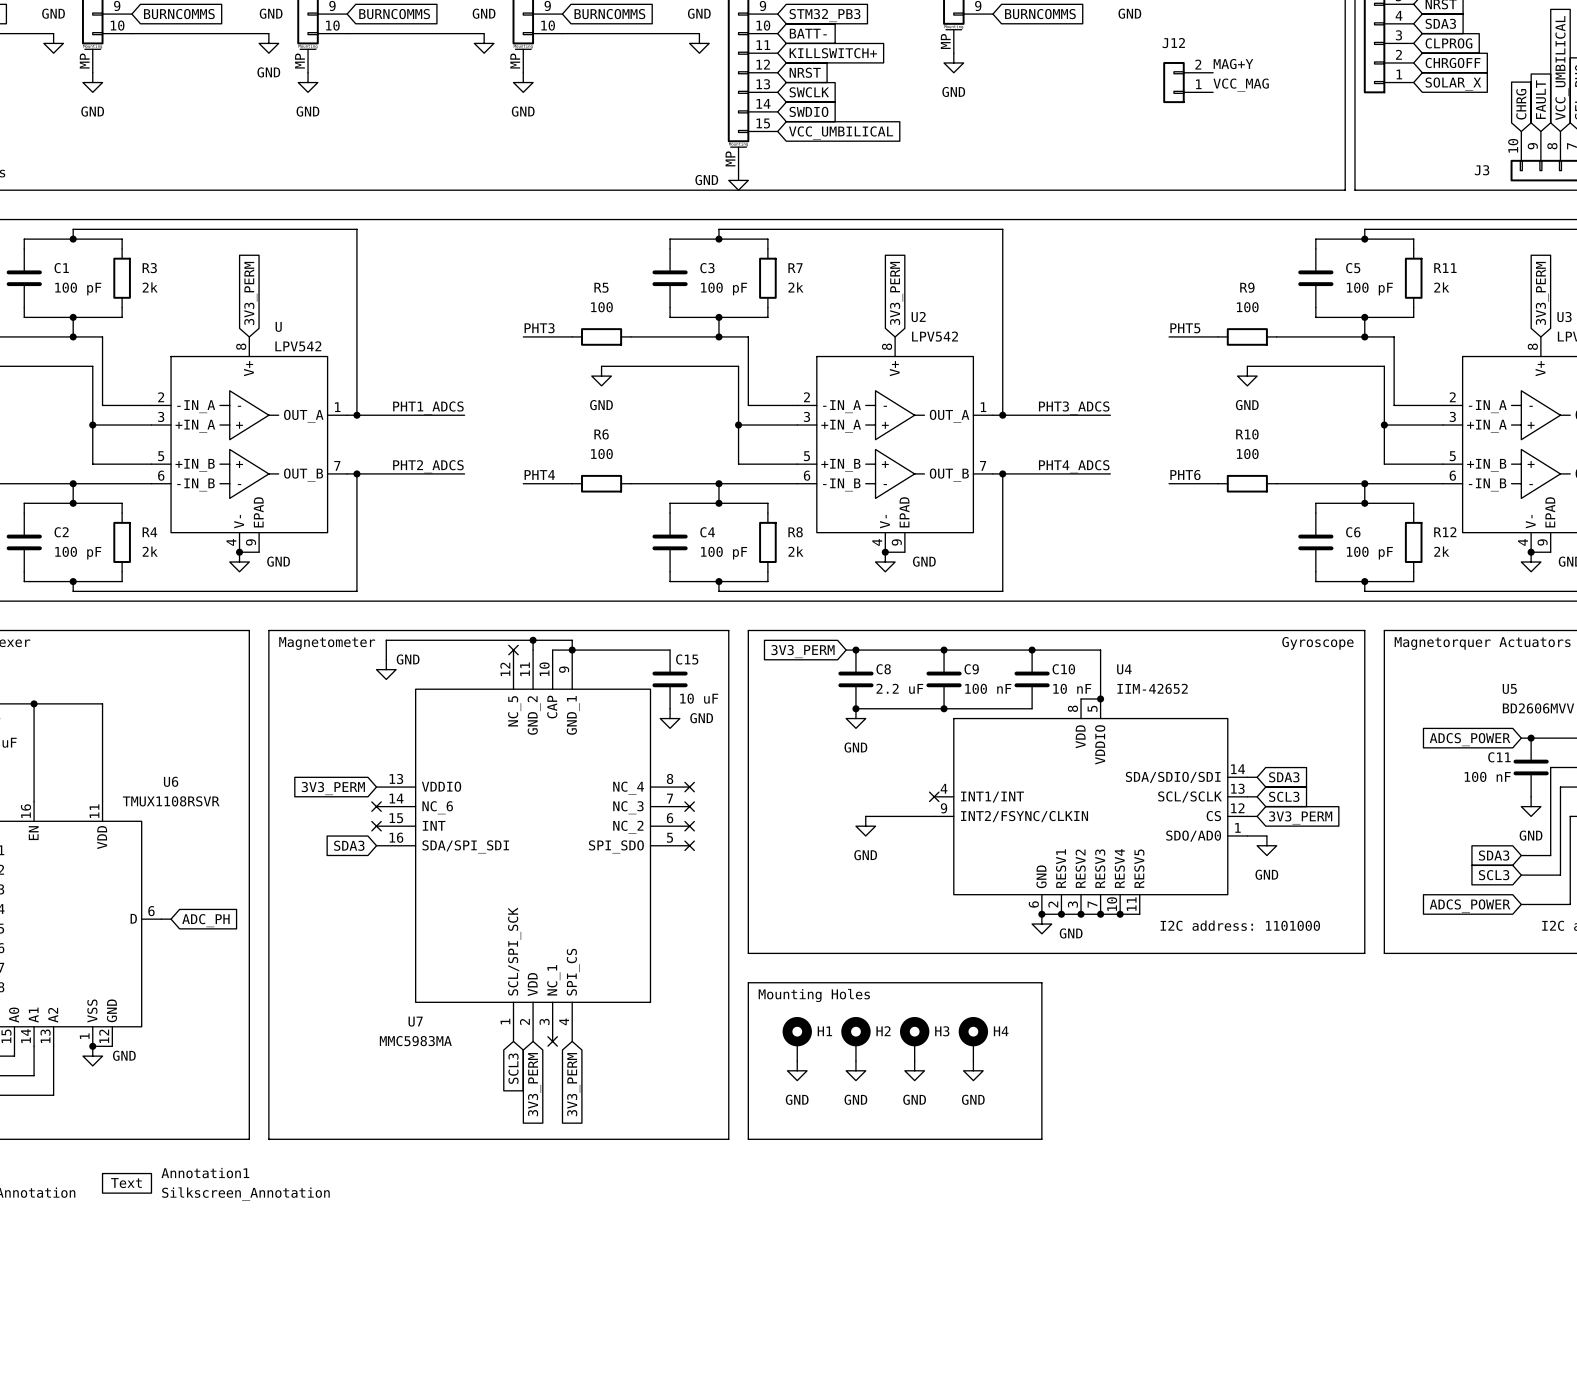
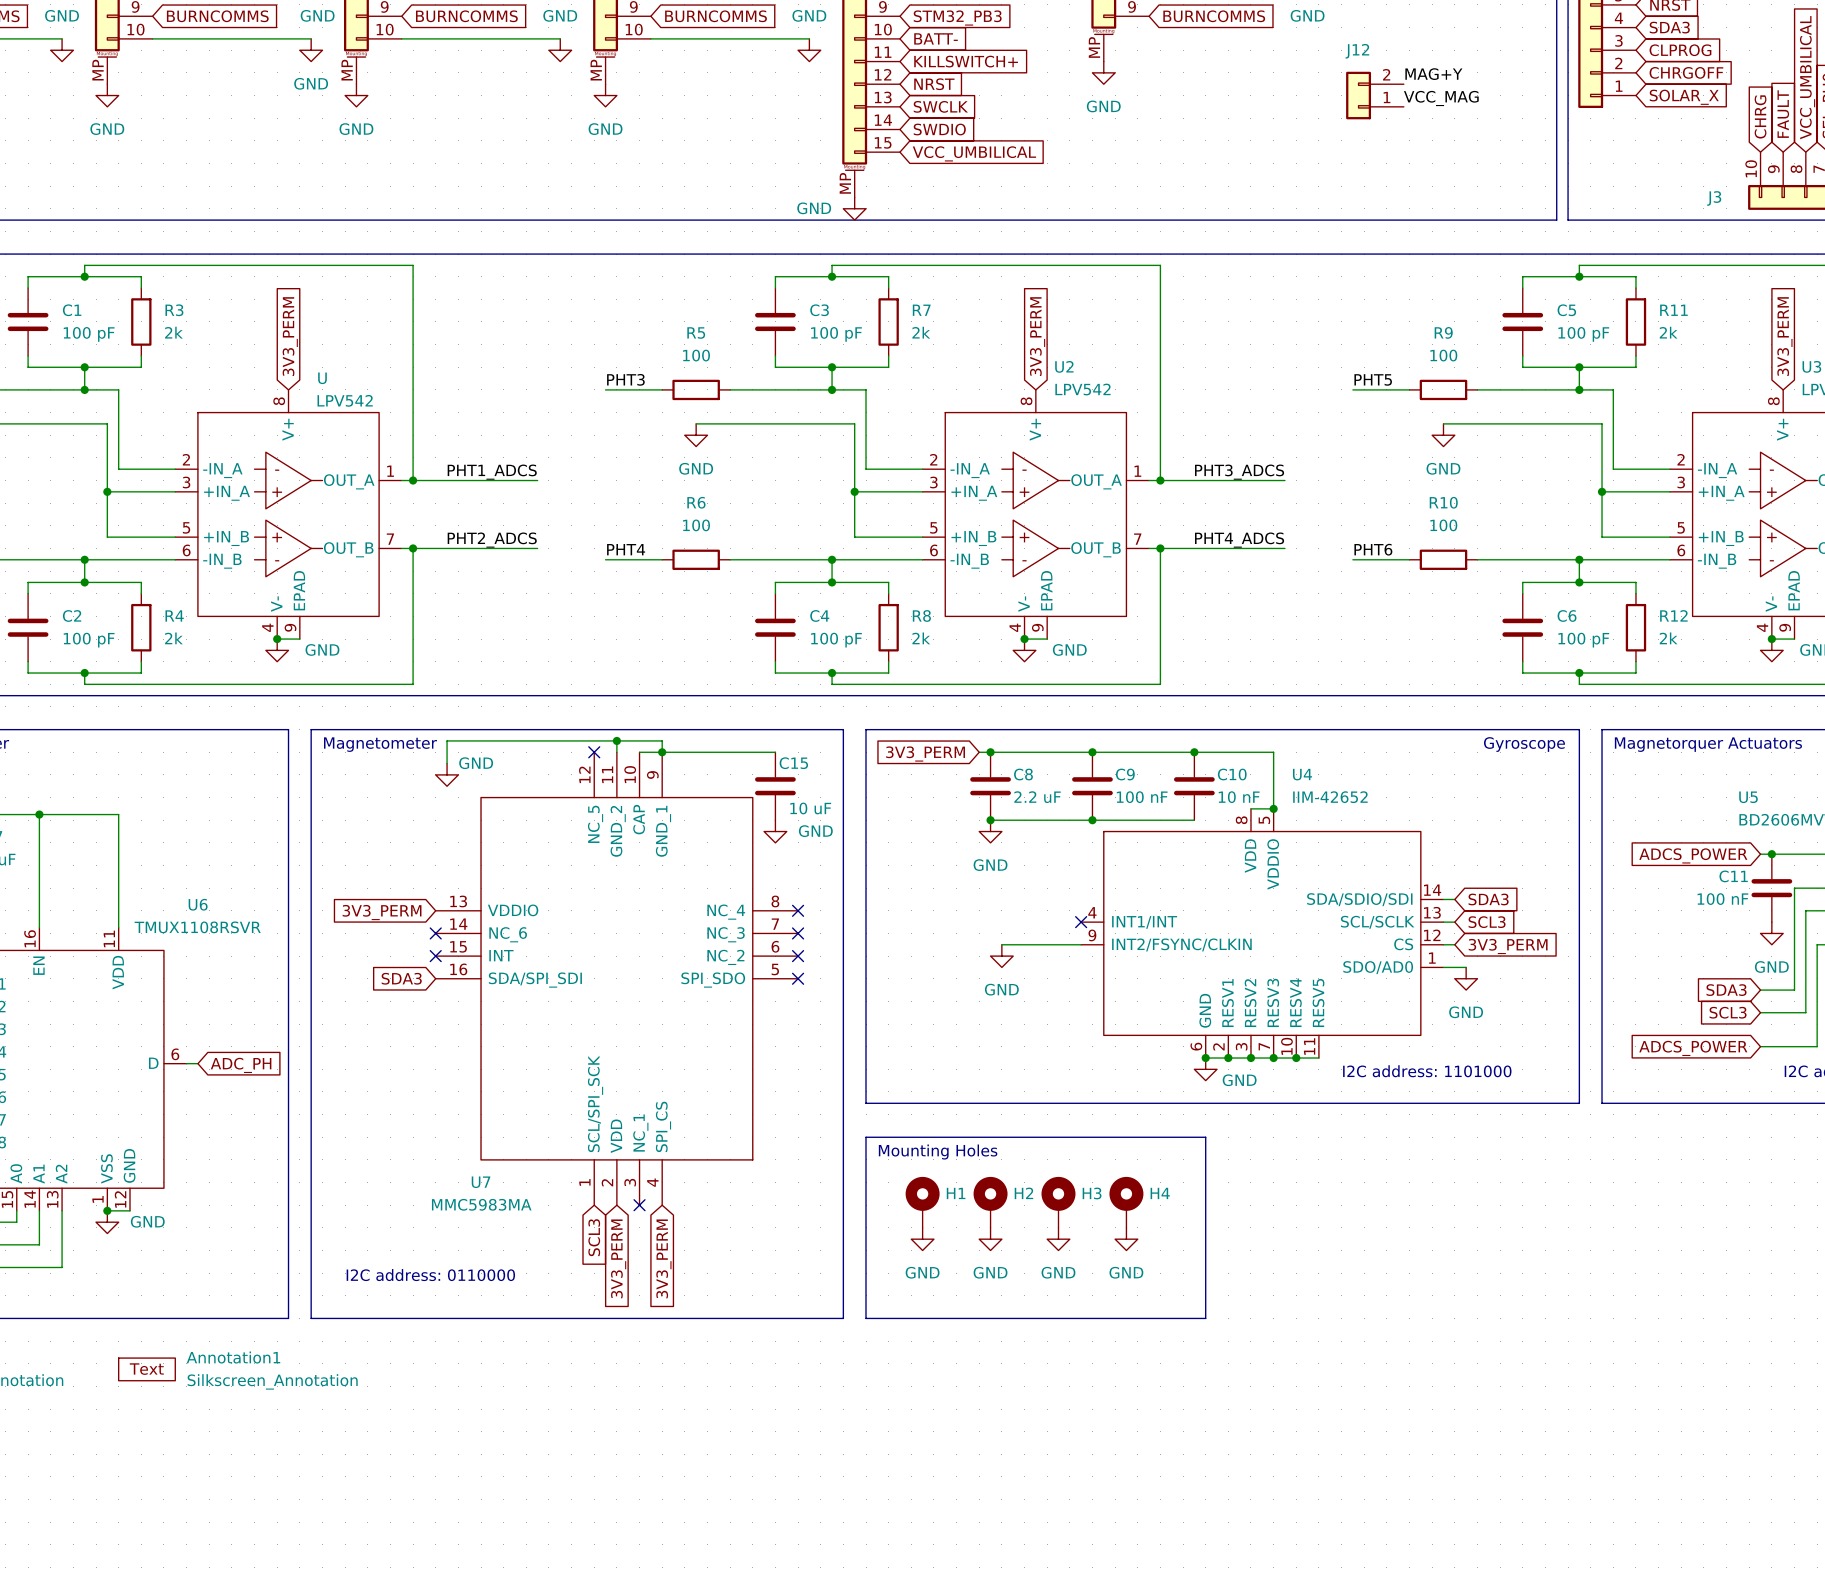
text: none -> I2C address: 0110000 (430, 1275)

